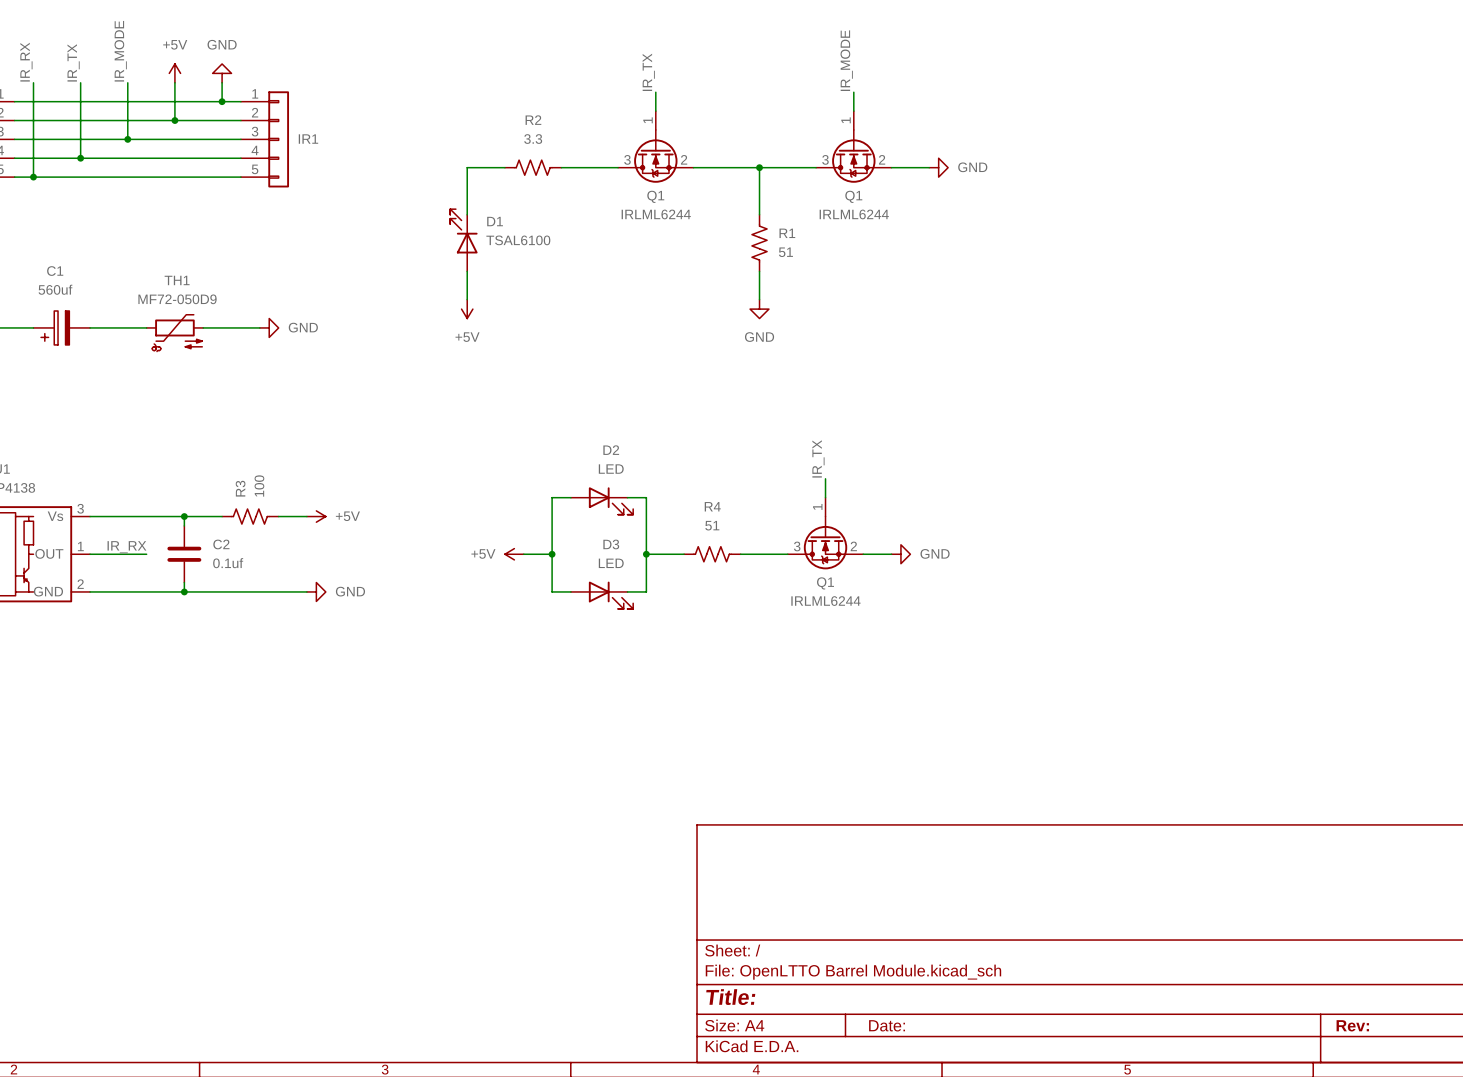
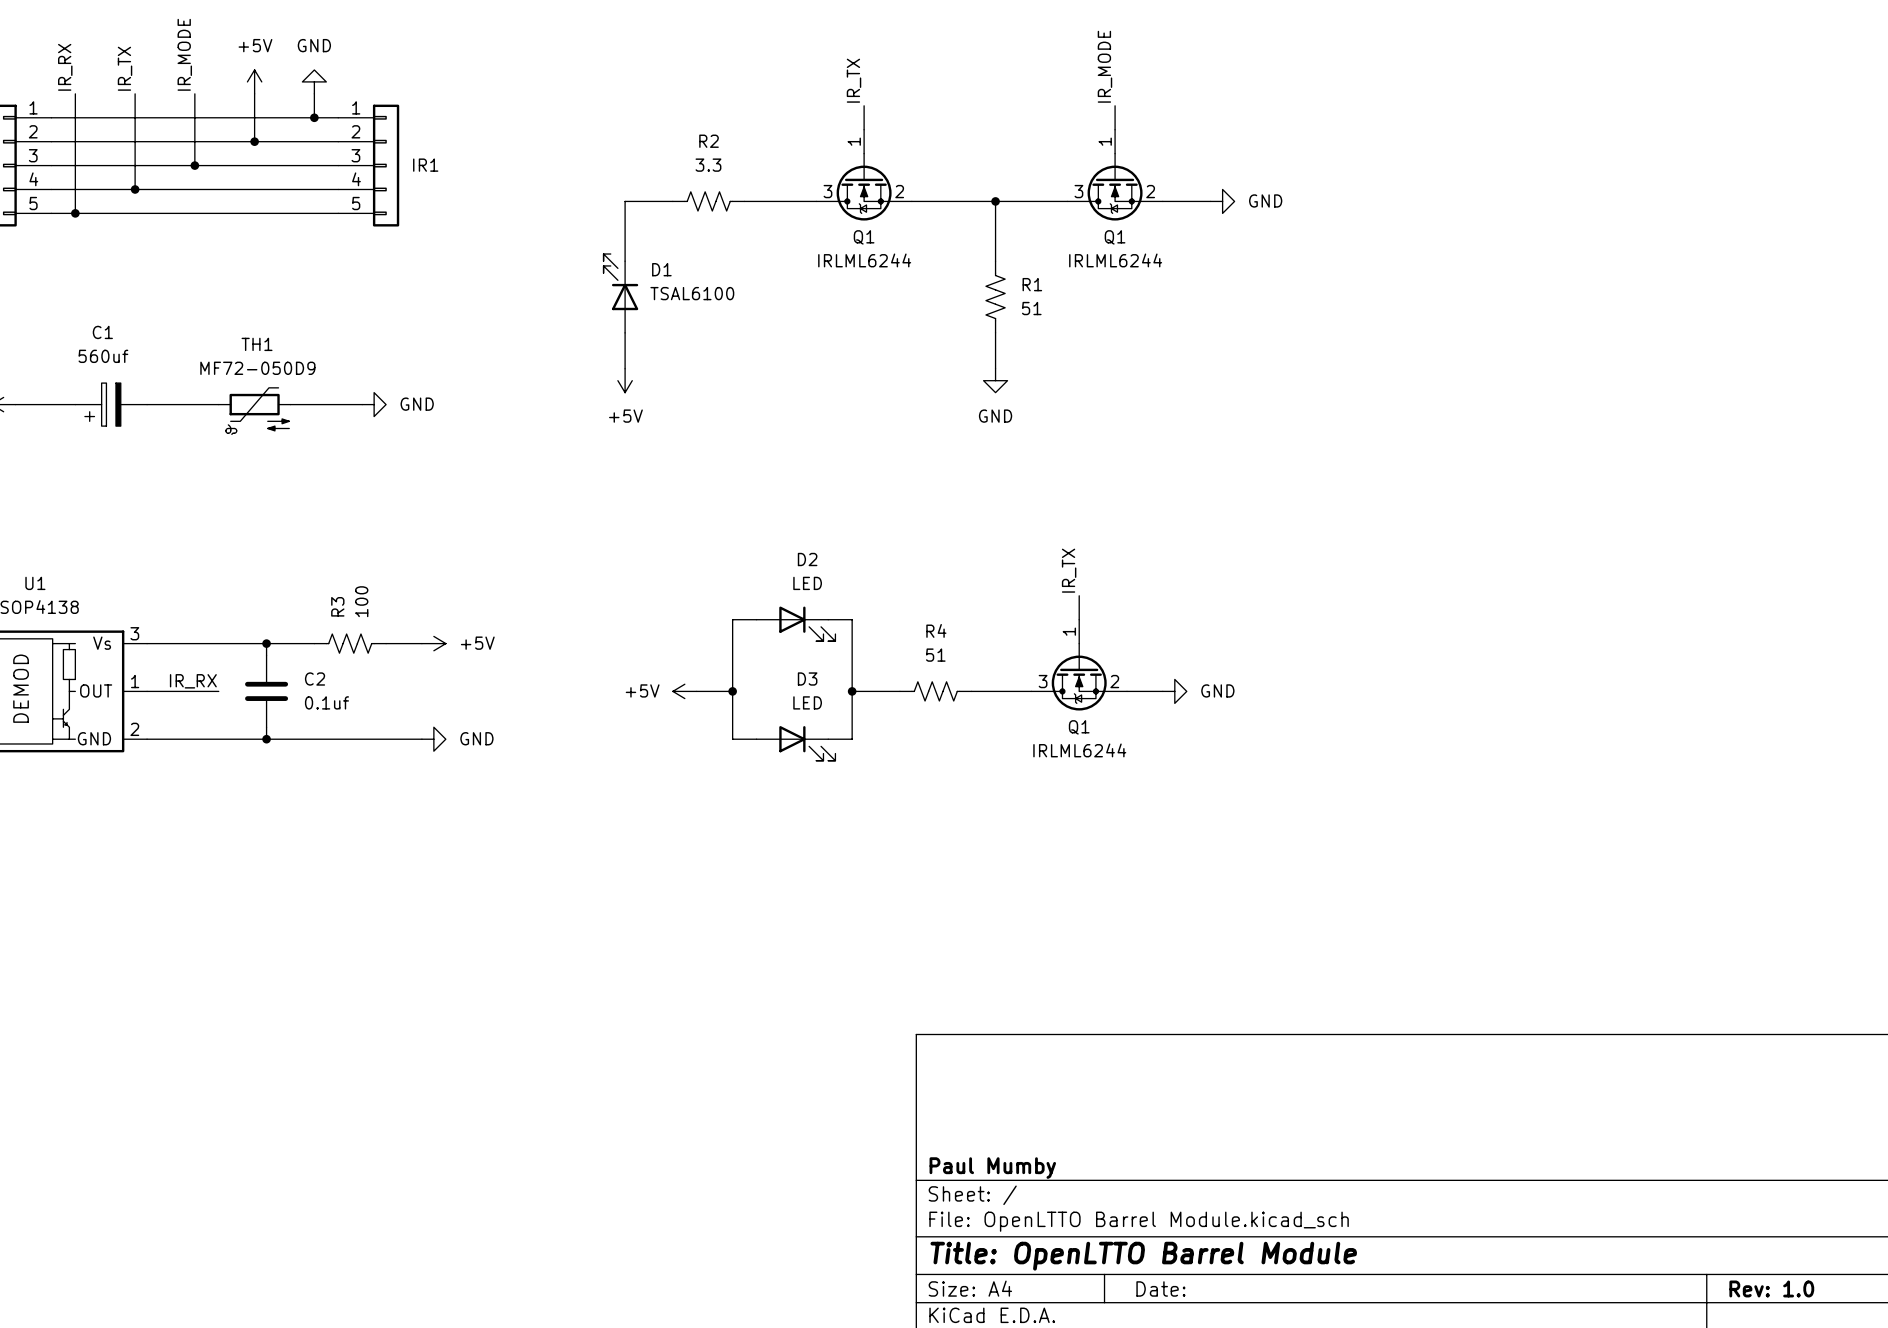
title block: none -> Paul Mumby (992, 1168)
title block: Title: (730, 997) -> Title: OpenLTTO Barrel Module (1143, 1256)
title block: Rev: (1352, 1025) -> Rev: 1.0 (1771, 1288)

